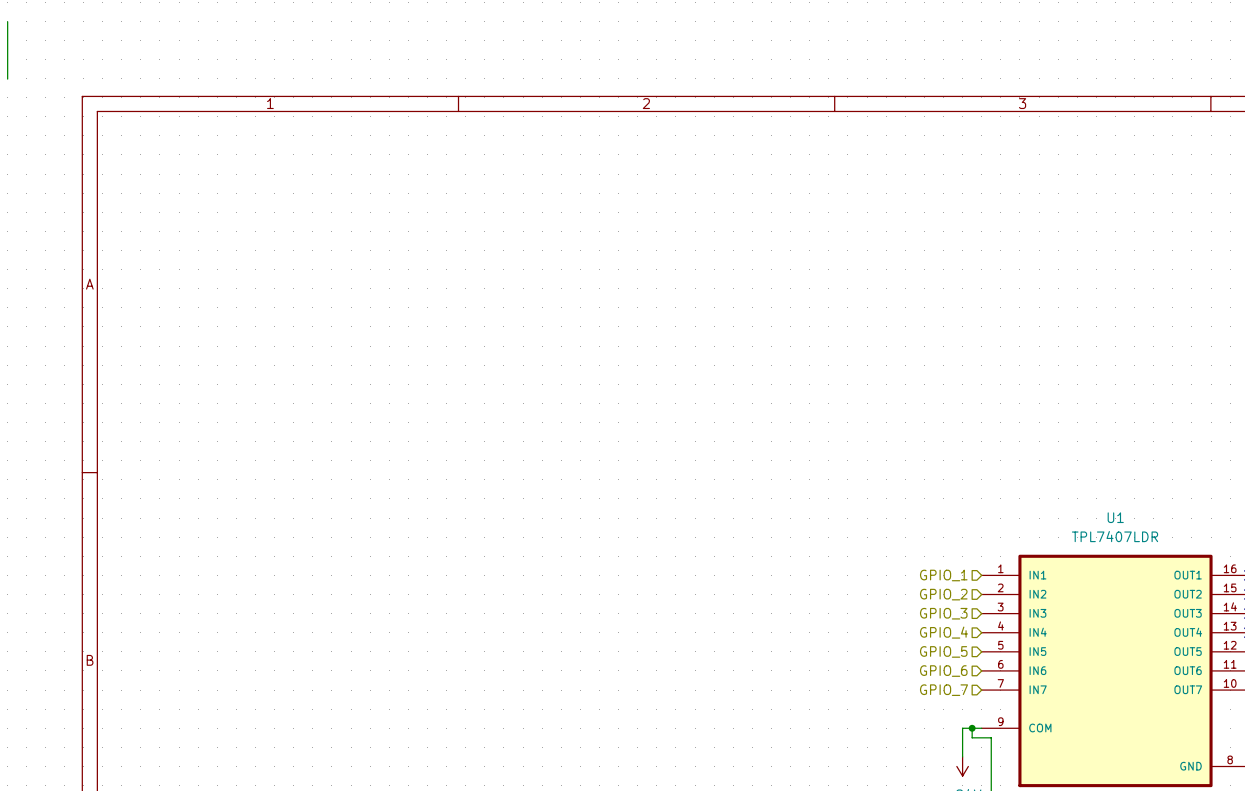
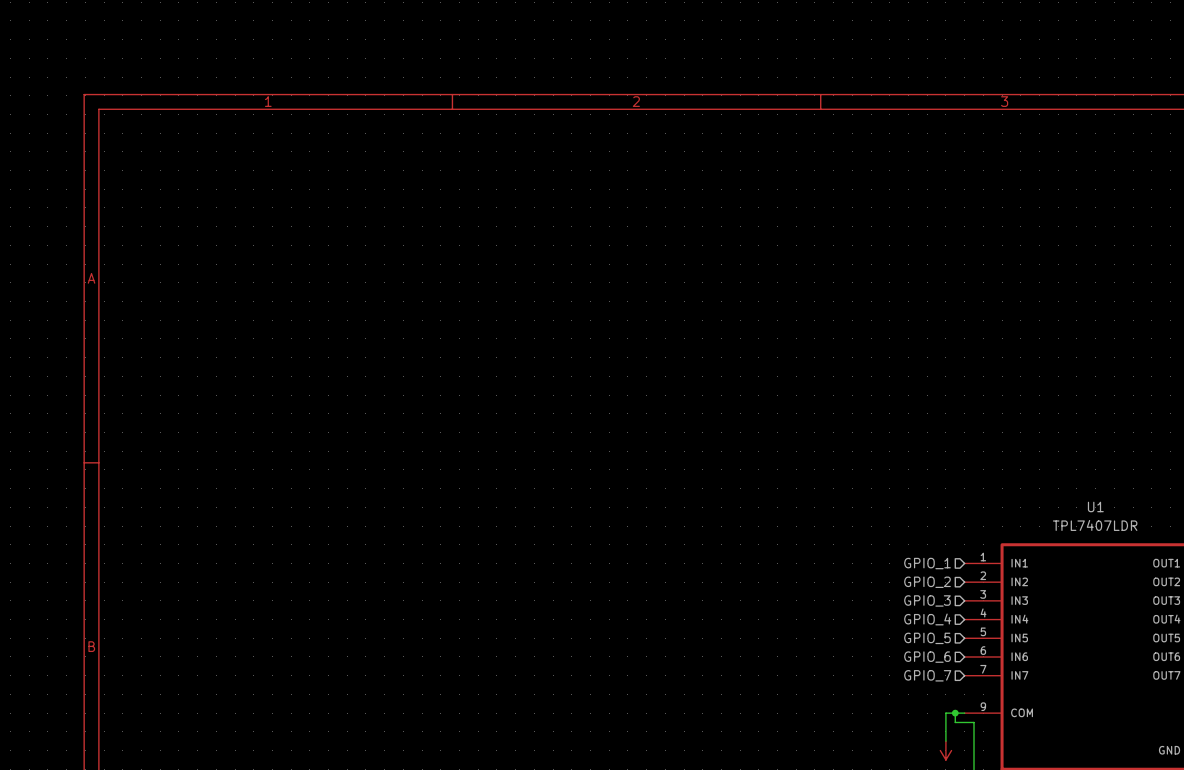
wire: (7, 21) (7, 79) -> none

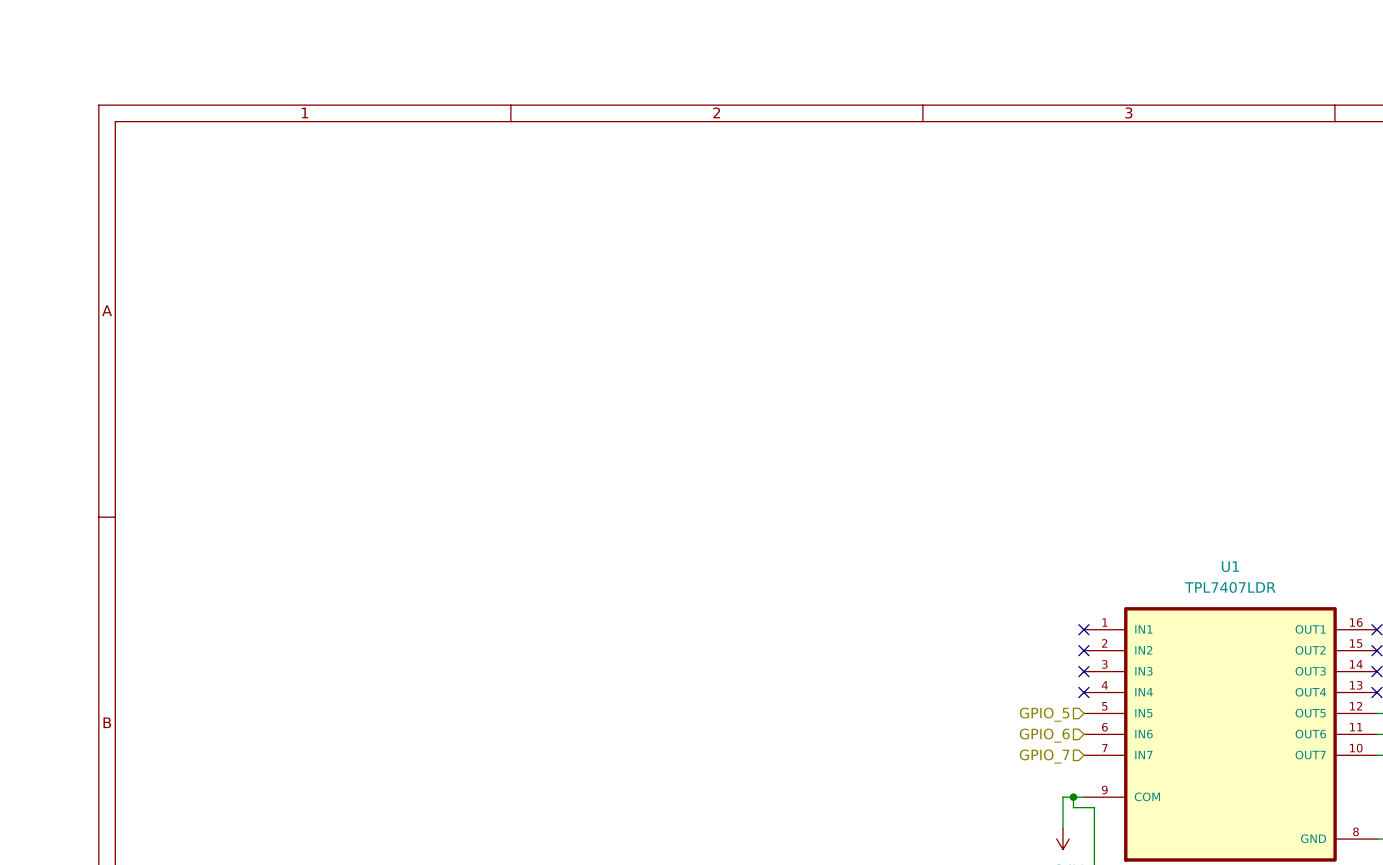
hierarchical label: GPIO_1 (927, 563) -> none
no-connect mark: none -> (1083, 629)
hierarchical label: GPIO_2 (927, 582) -> none
no-connect mark: none -> (1083, 650)
hierarchical label: GPIO_3 (927, 600) -> none
no-connect mark: none -> (1083, 671)
hierarchical label: GPIO_4 (927, 619) -> none
no-connect mark: none -> (1083, 692)

